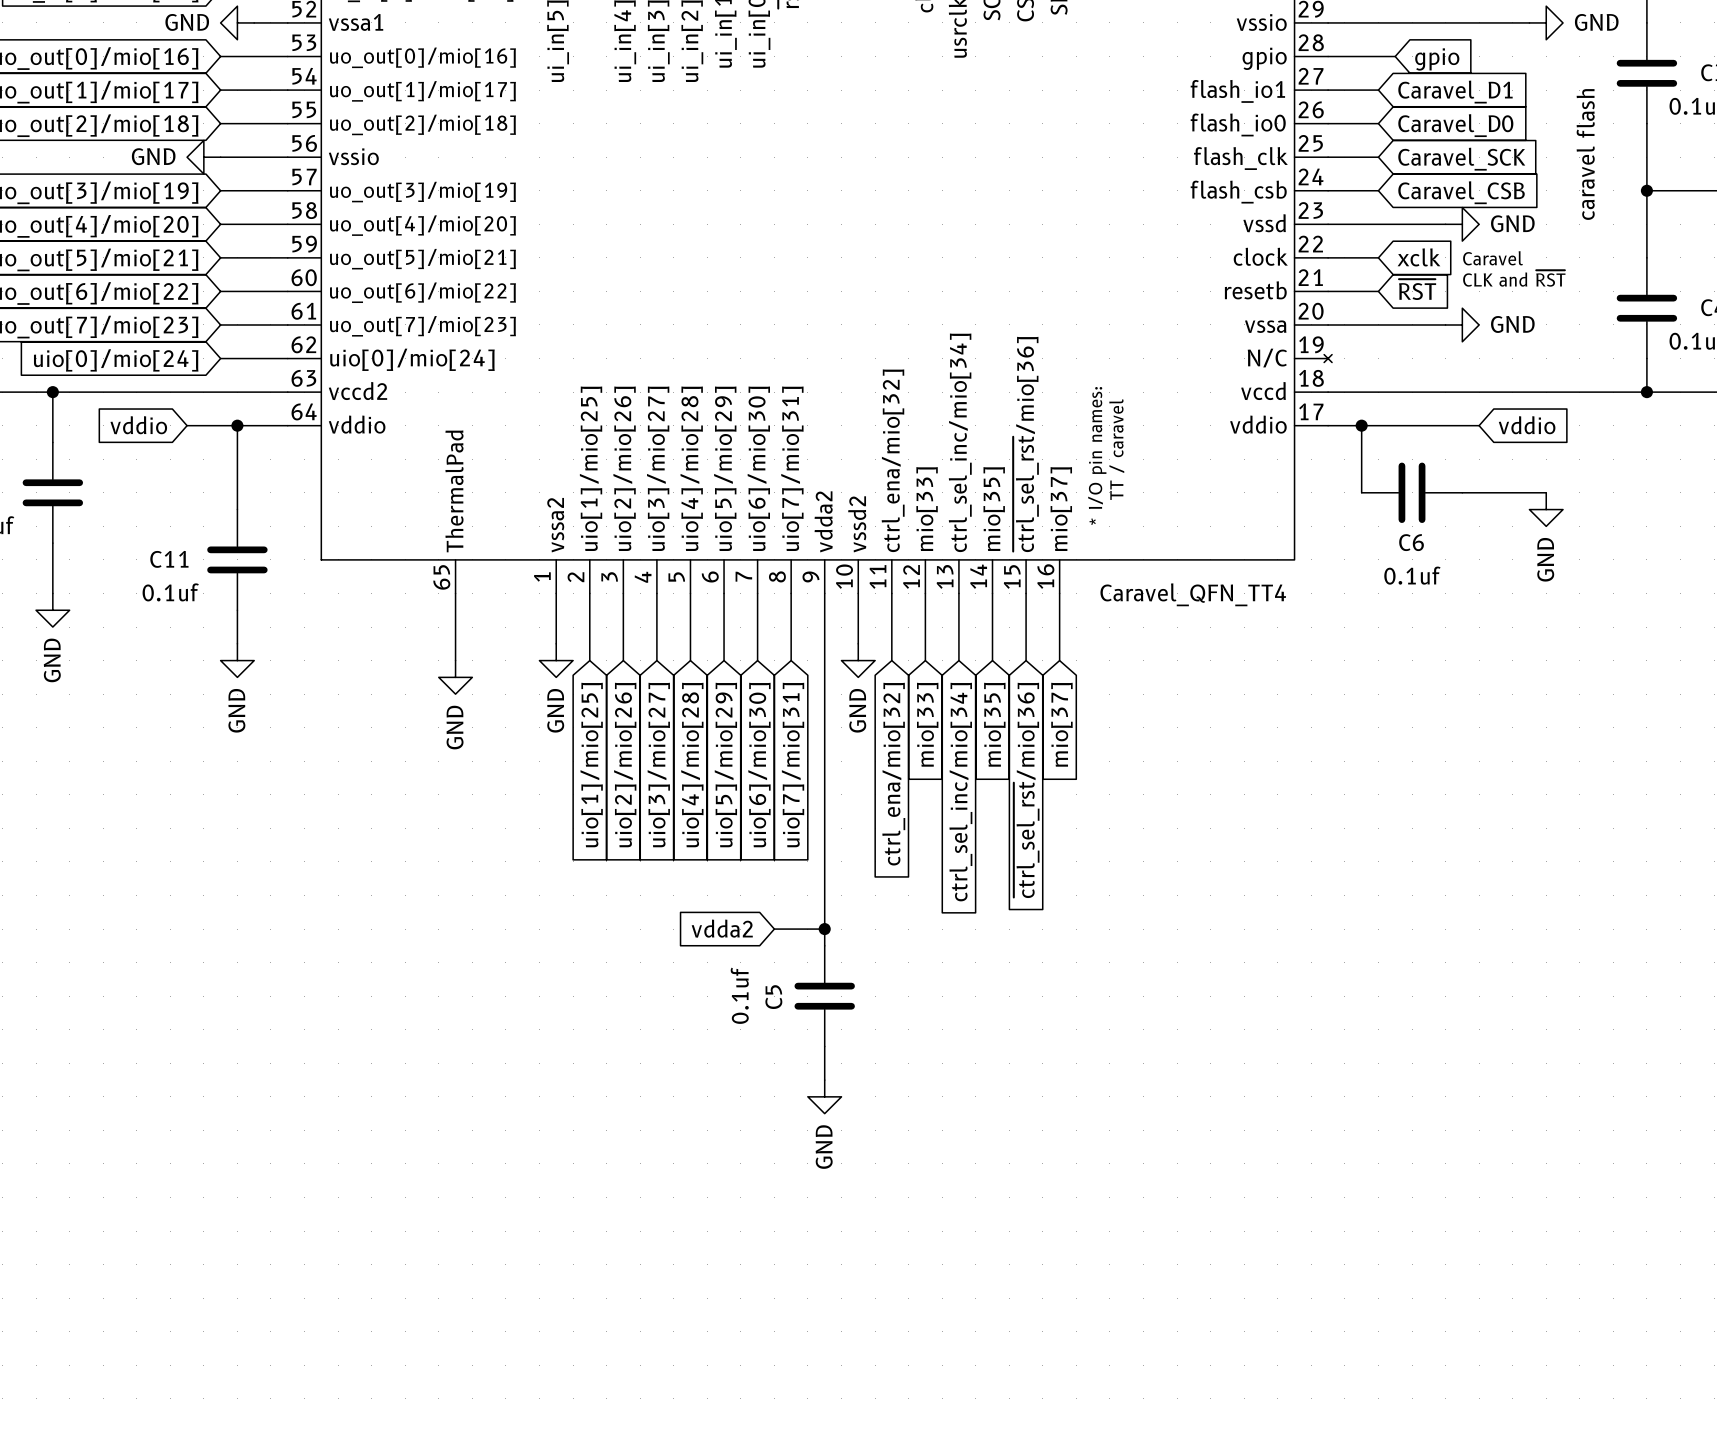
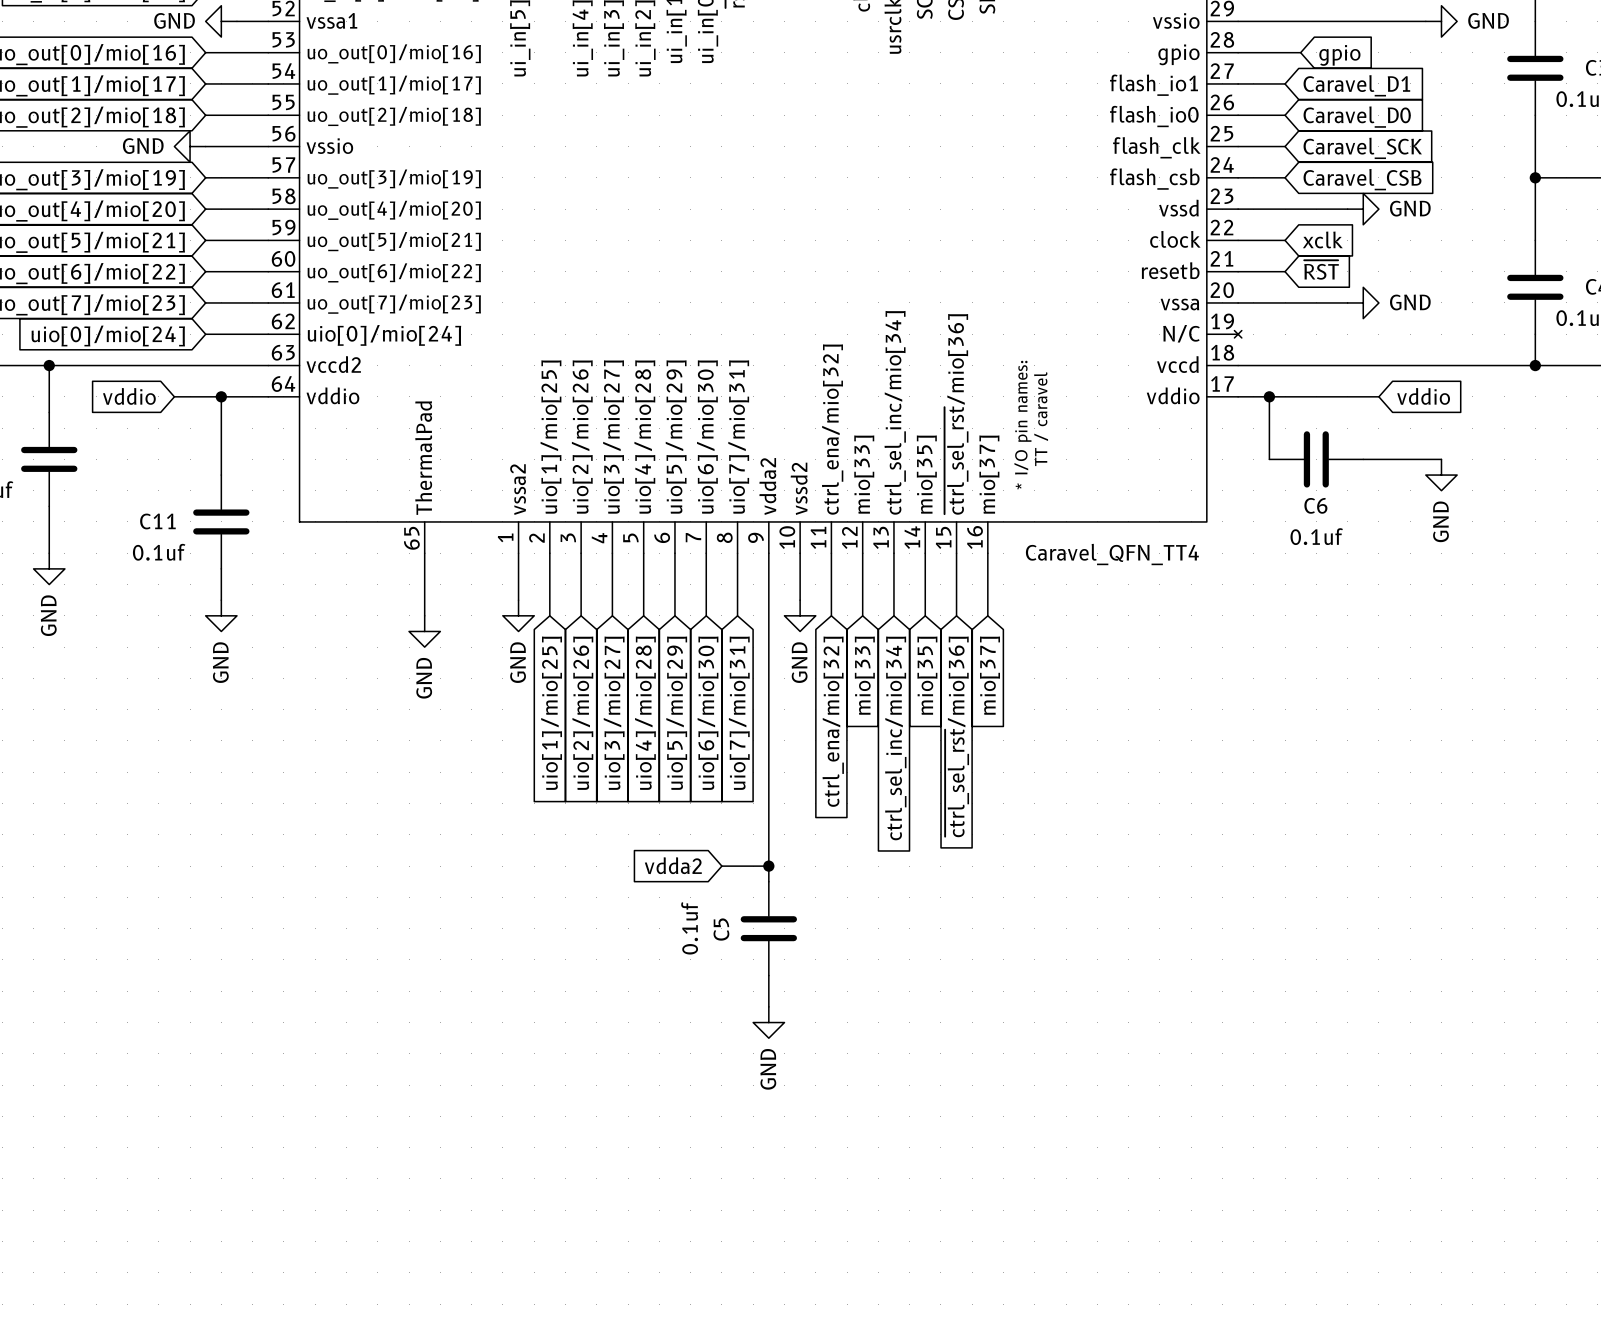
text: caravel flash (1585, 154) -> none
text: Caravel (1493, 258) -> none
text: CLK and ~{RST} (1514, 278) -> none

